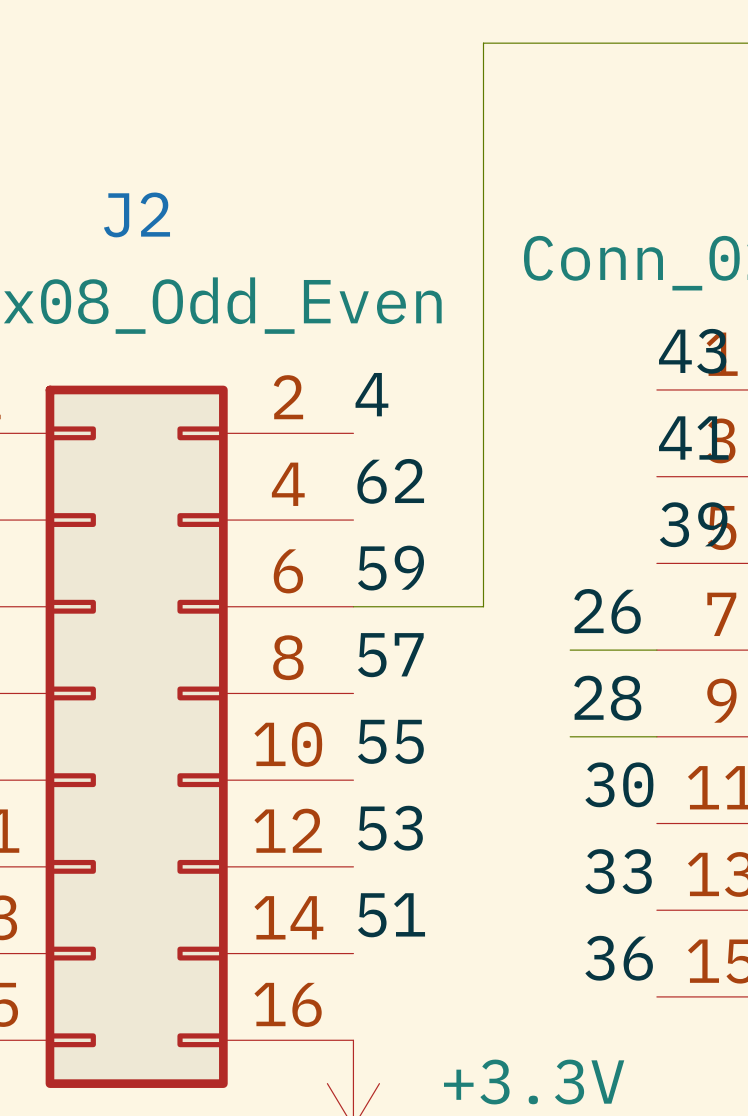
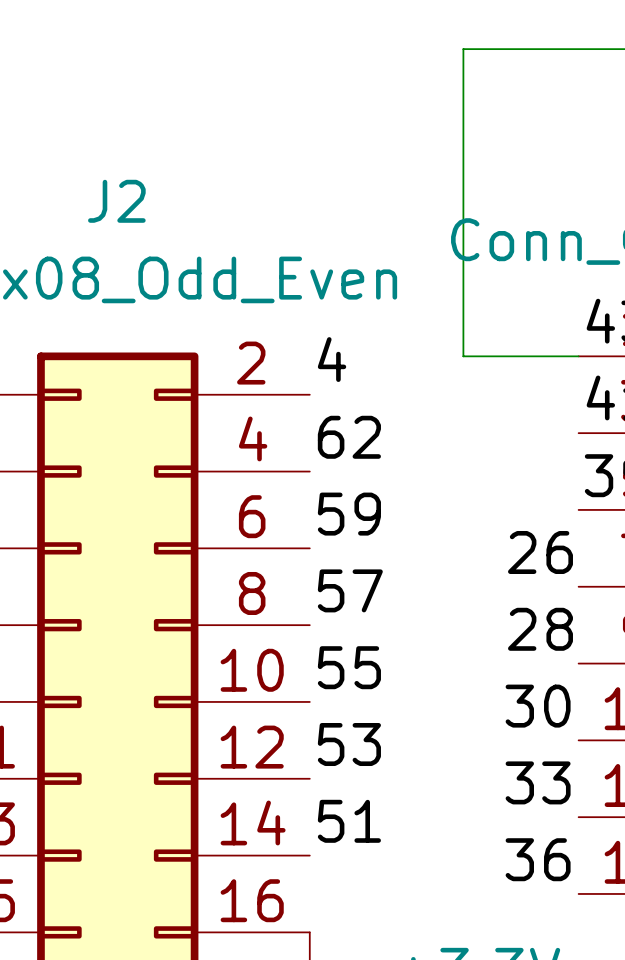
wire: (526, 43) (483, 43) (483, 606) (353, 606) -> (463, 49) (463, 356) (578, 356)
wire: (570, 650) (656, 650) -> none
wire: (570, 736) (656, 736) -> none

